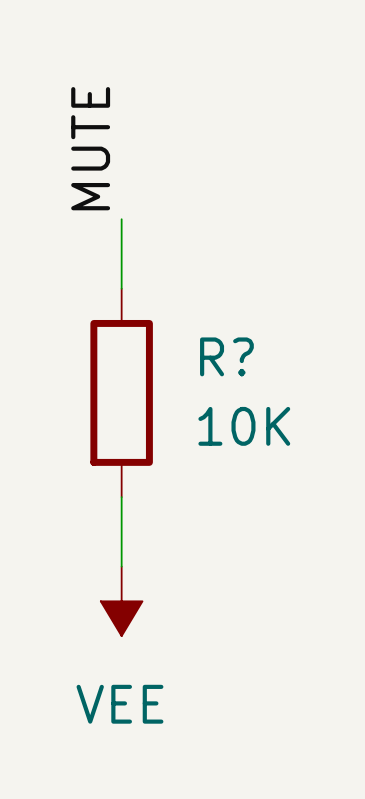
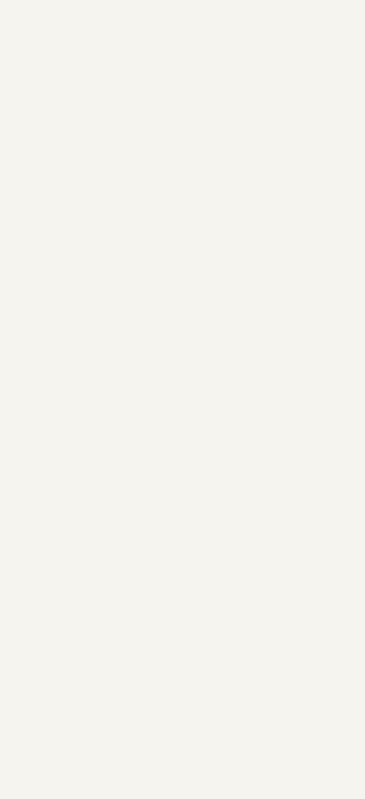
label: MUTE (90, 148) -> none
wire: (121, 219) (121, 288) -> none
R?: 10K (121, 392) -> none
wire: (121, 497) (121, 566) -> none
power symbol: VEE (121, 601) -> none

